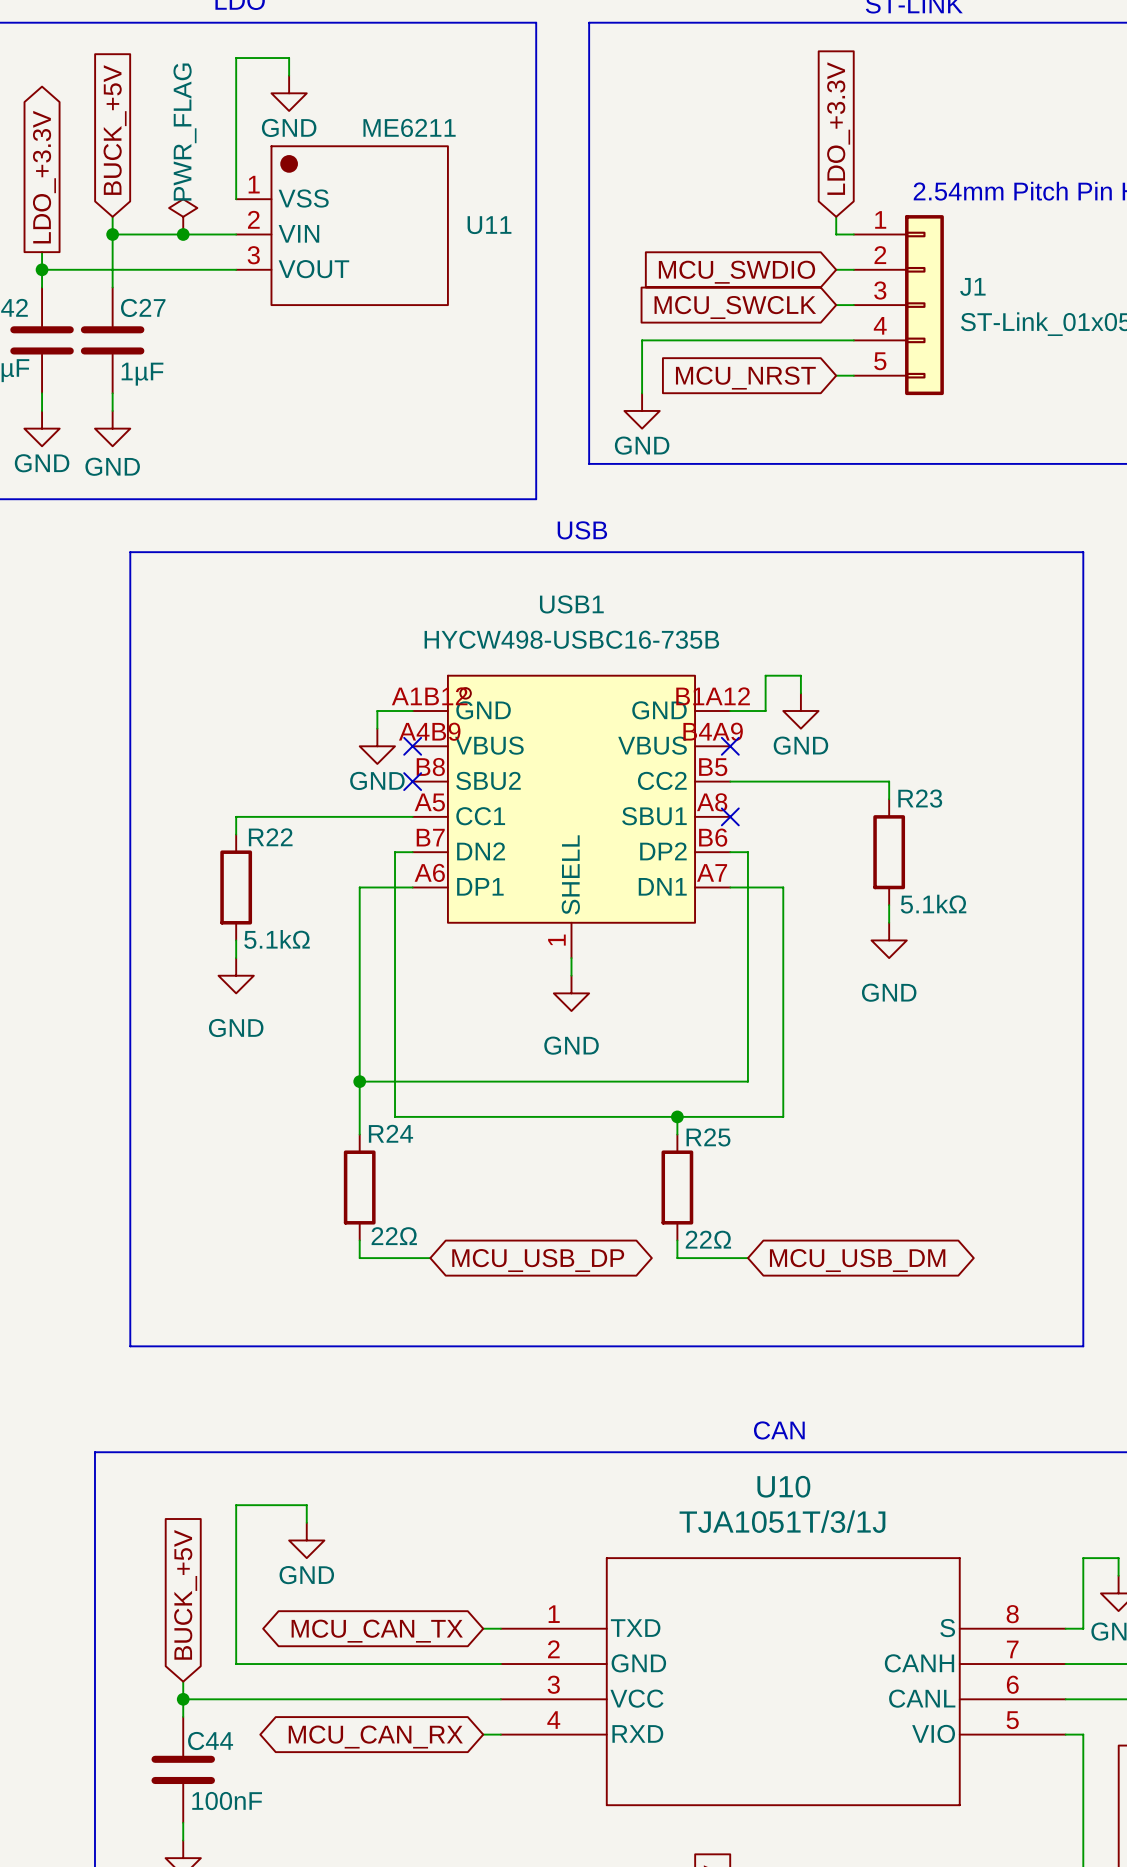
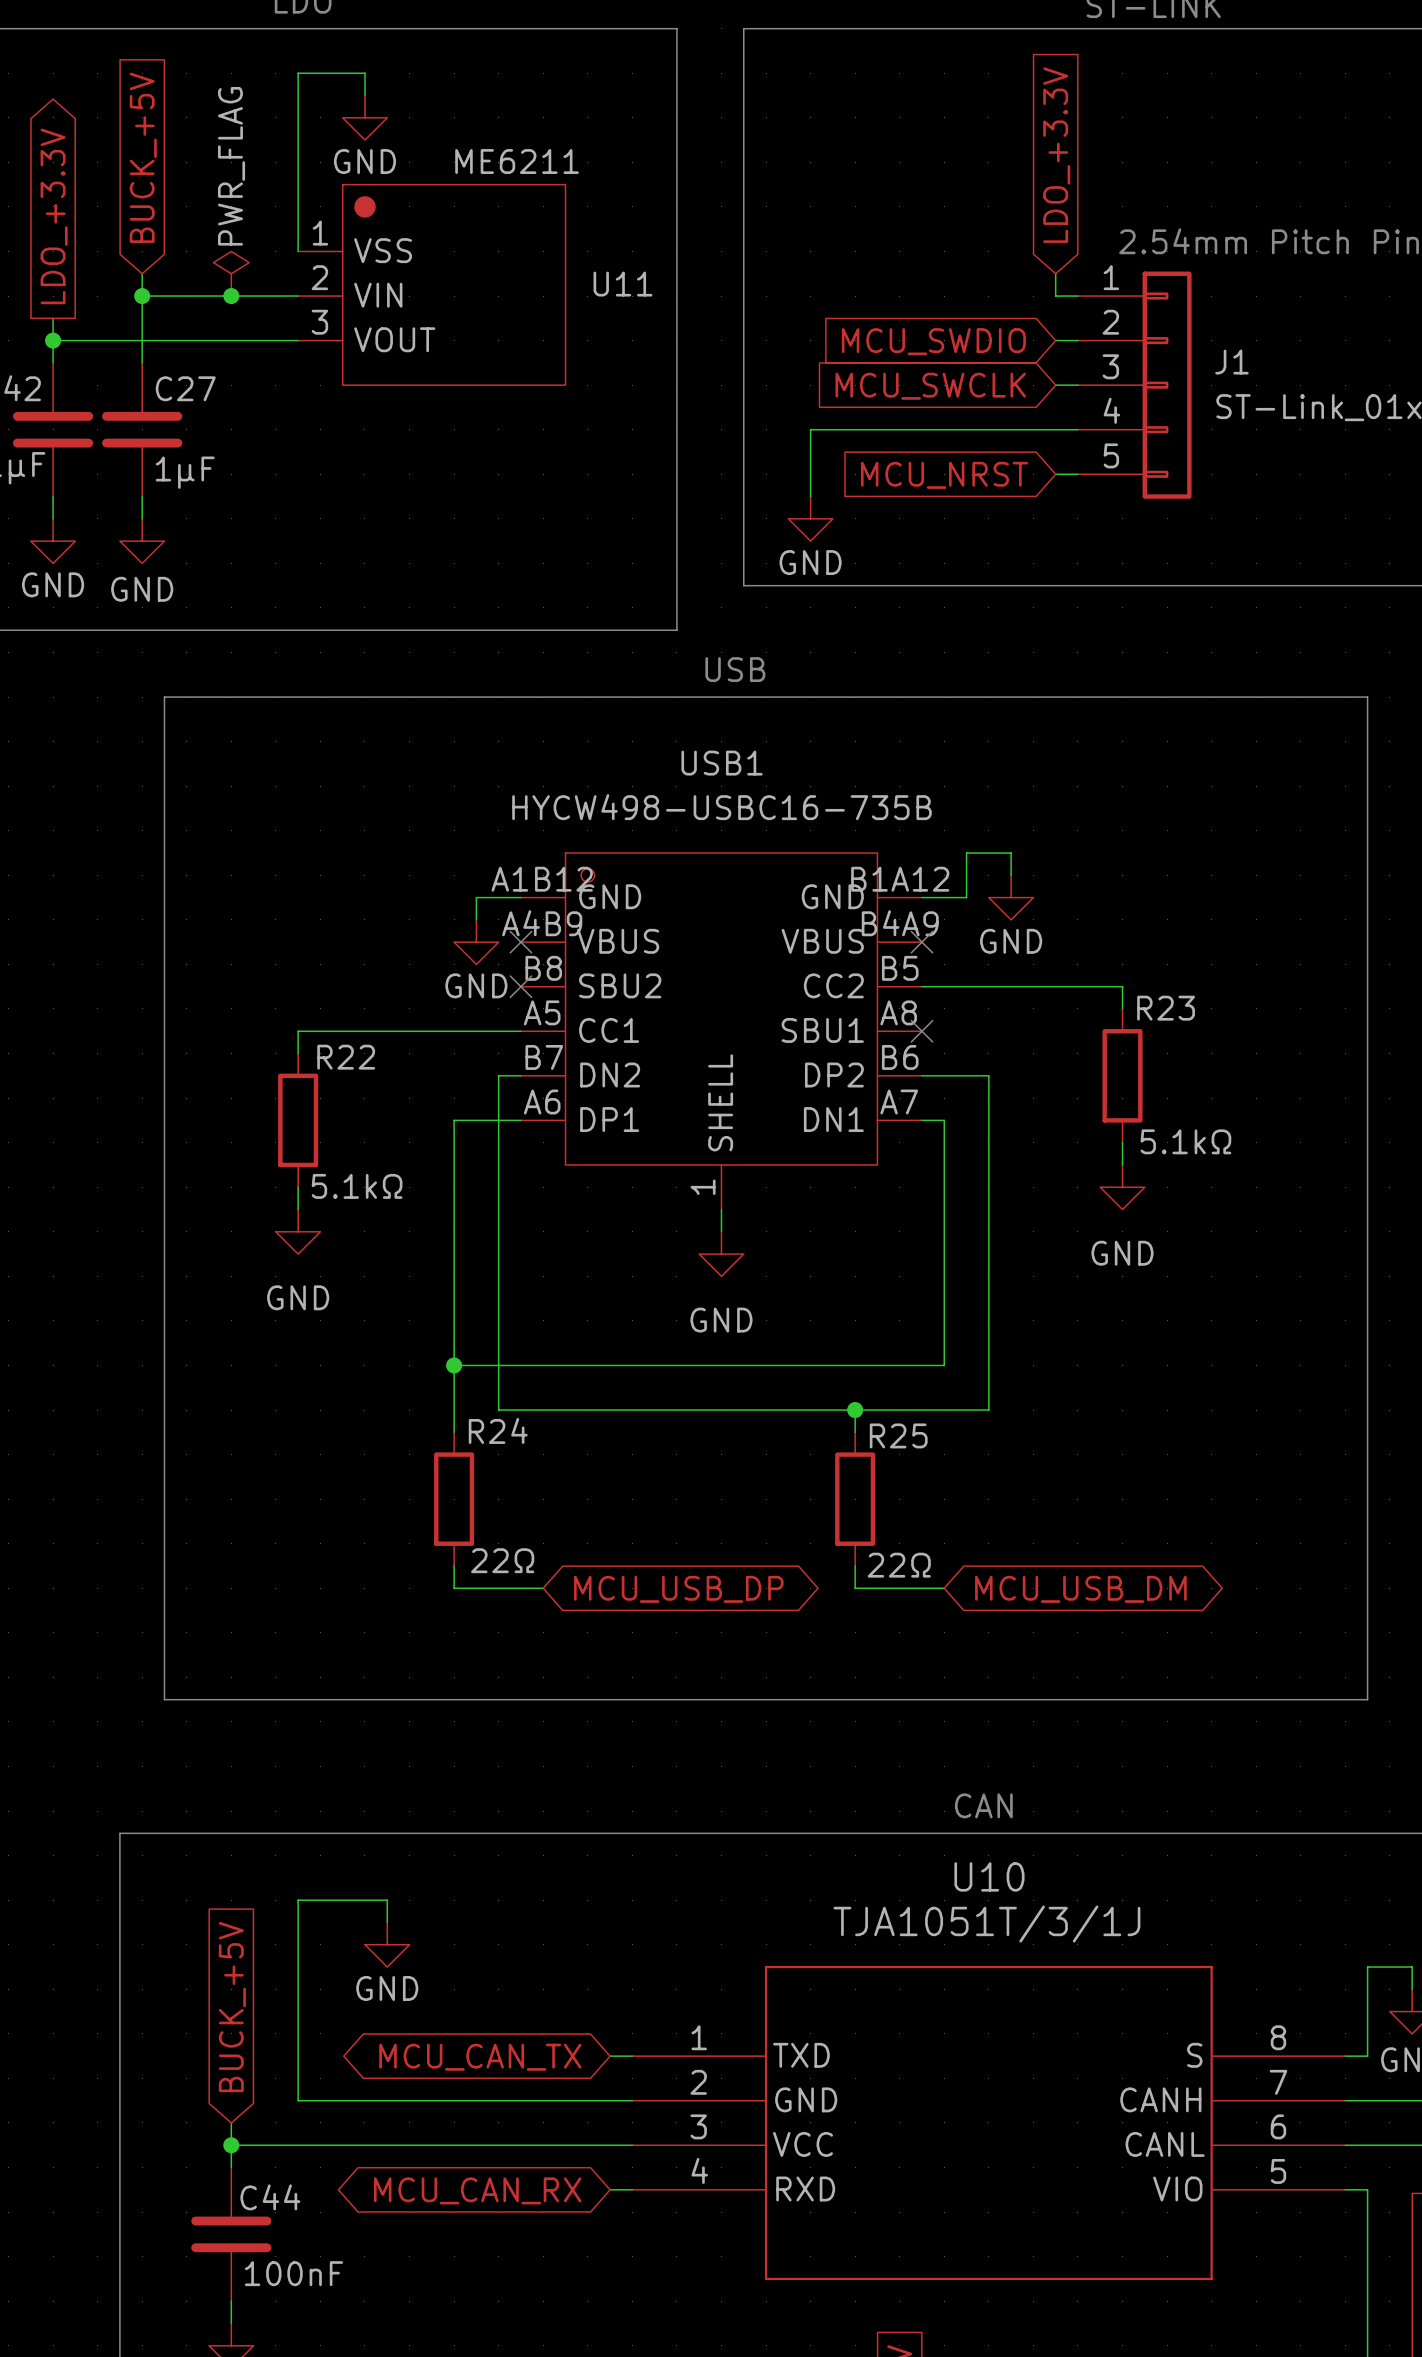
wire: (747, 852) (747, 887) (783, 887) -> (944, 1075) (988, 1075) (988, 1120)

